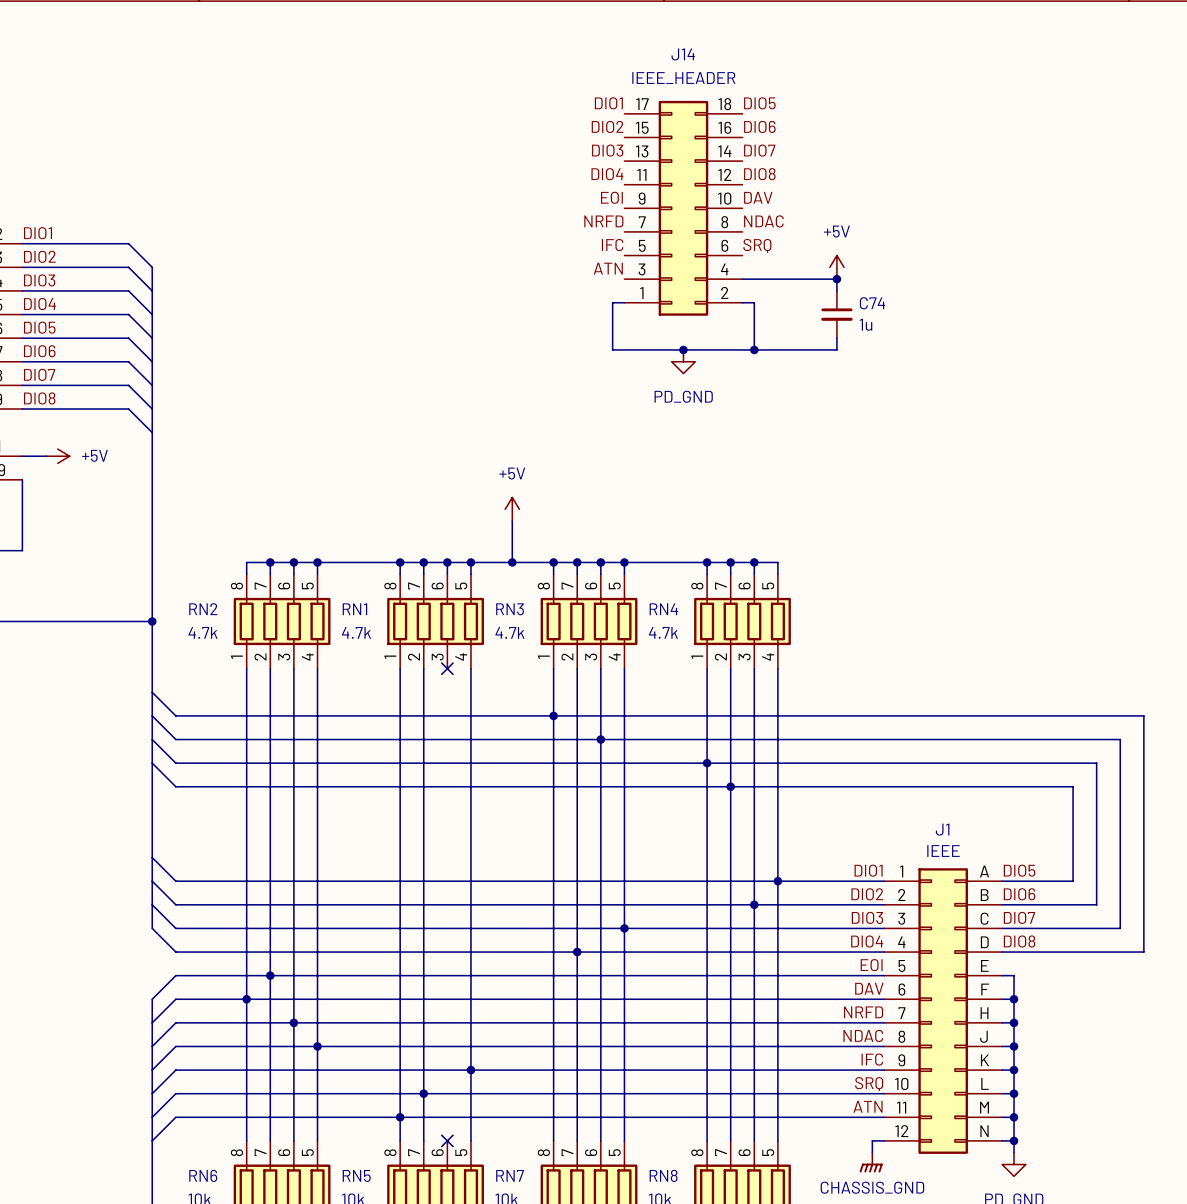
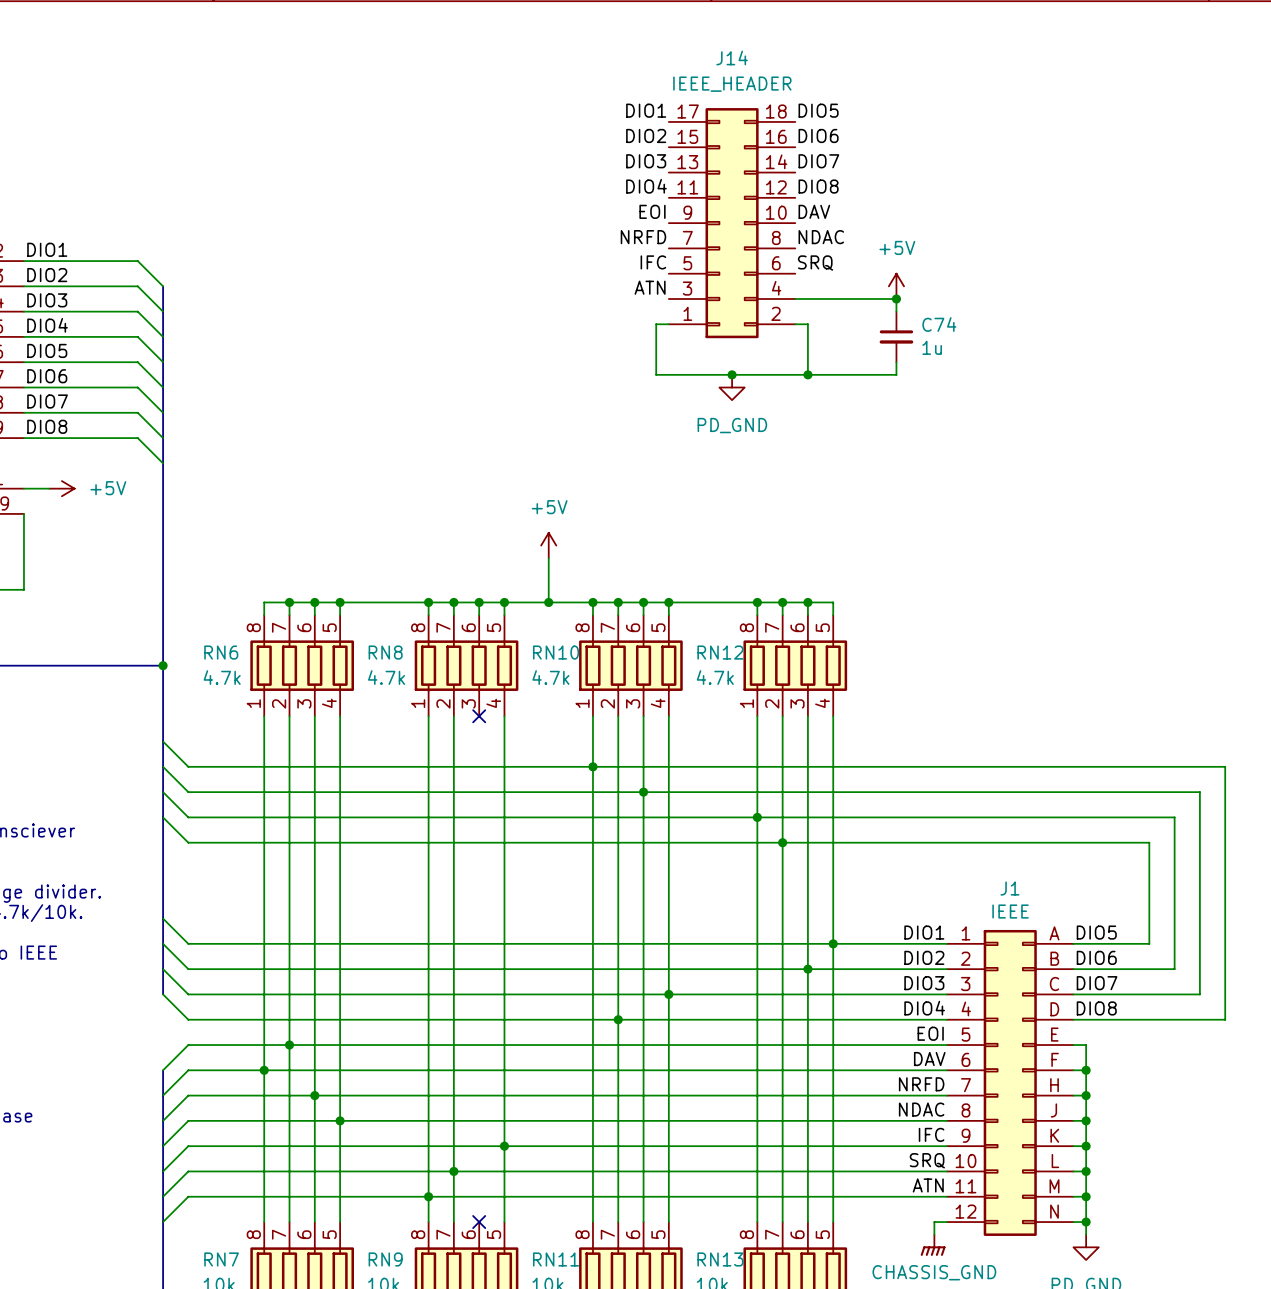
RN2 name: RN2 (203, 609) -> RN6 (221, 652)
RN1 name: RN1 (354, 609) -> RN8 (385, 652)
RN3 name: RN3 (510, 609) -> RN10 (556, 652)
RN4 name: RN4 (663, 609) -> RN12 (720, 652)
RN6 name: RN6 (203, 1175) -> RN7 (221, 1259)
RN5 name: RN5 (356, 1175) -> RN9 (385, 1259)
RN7 name: RN7 (510, 1175) -> RN11 (556, 1259)
RN8 name: RN8 (663, 1175) -> RN13 (720, 1259)

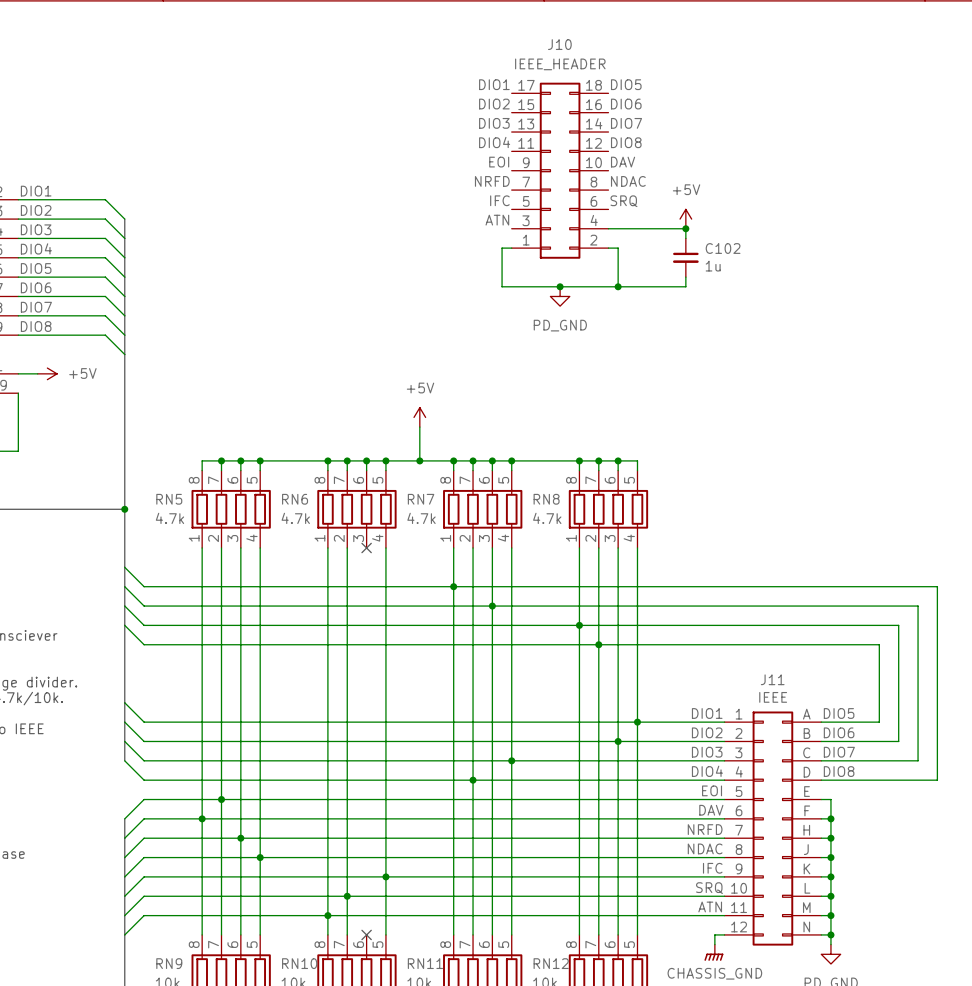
J14 name: J14 (732, 57) -> J10 (559, 44)
C74 name: C74 (939, 324) -> C102 (723, 248)
RN6 name: RN6 (221, 652) -> RN5 (169, 499)
RN8 name: RN8 (385, 652) -> RN6 (295, 499)
RN10 name: RN10 (556, 652) -> RN7 (421, 499)
RN12 name: RN12 (720, 652) -> RN8 (546, 499)
J1 name: J1 (1009, 888) -> J11 (772, 679)
RN7 name: RN7 (221, 1259) -> RN9 (169, 963)
RN9 name: RN9 (385, 1259) -> RN10 (299, 963)
RN13 name: RN13 (720, 1259) -> RN12 (551, 963)

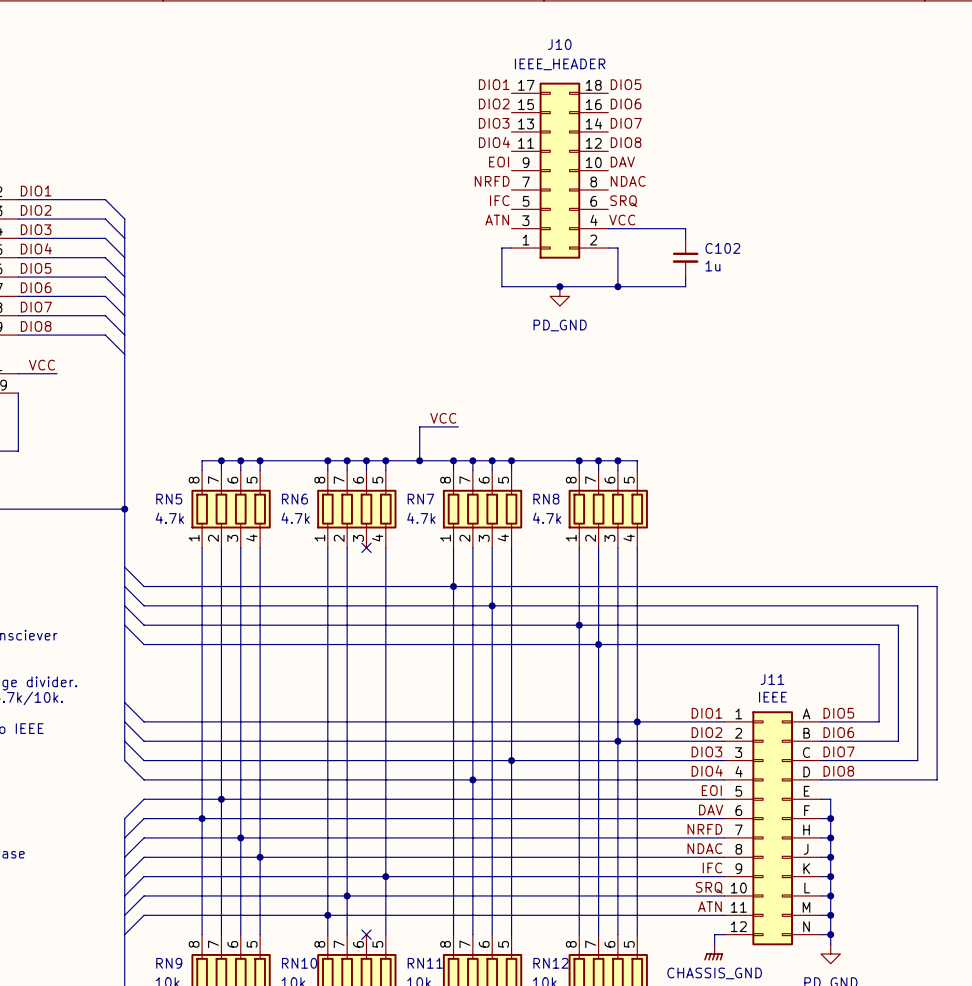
power symbol: +5V (685, 219) -> none
label: none -> VCC (622, 220)
junction: (685, 228) -> none
label: none -> VCC (41, 365)
power symbol: +5V (47, 373) -> none
power symbol: +5V (419, 417) -> none
label: none -> VCC (443, 418)
wire: none -> (419, 426) (458, 426)

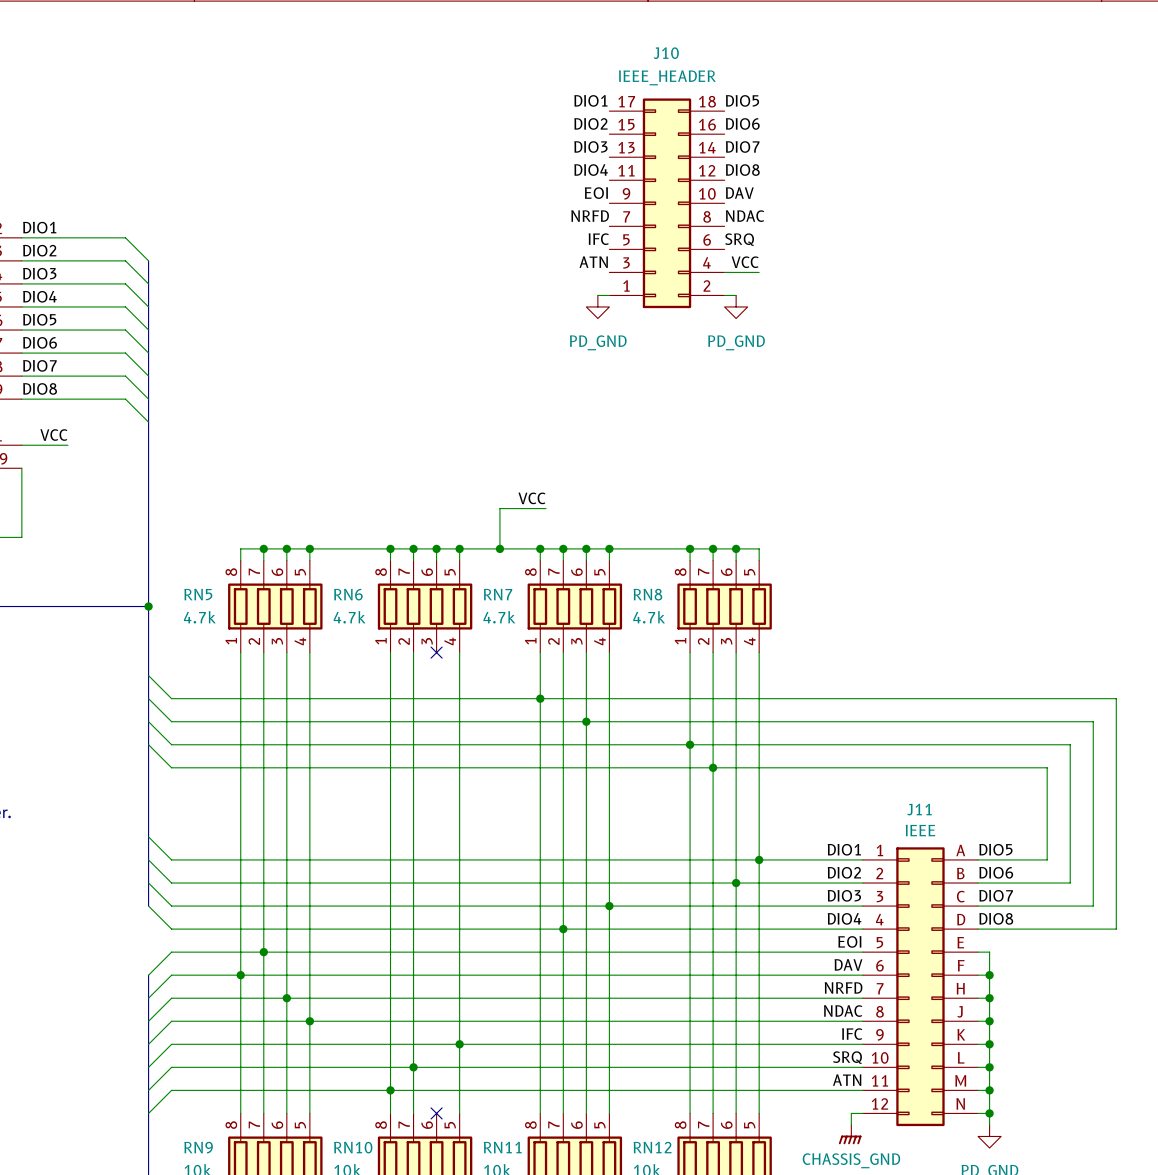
wire: (637, 228) (685, 228) (685, 238) -> none
wire: (501, 248) (501, 286) (685, 286) (685, 277) -> none
wire: (617, 248) (617, 286) -> none
power symbol: none -> PD_GND (597, 306)
power symbol: none -> PD_GND (736, 306)
C102: 1u (685, 257) -> none
junction: (559, 286) -> none
junction: (617, 286) -> none
power symbol: PD_GND (559, 296) -> none

